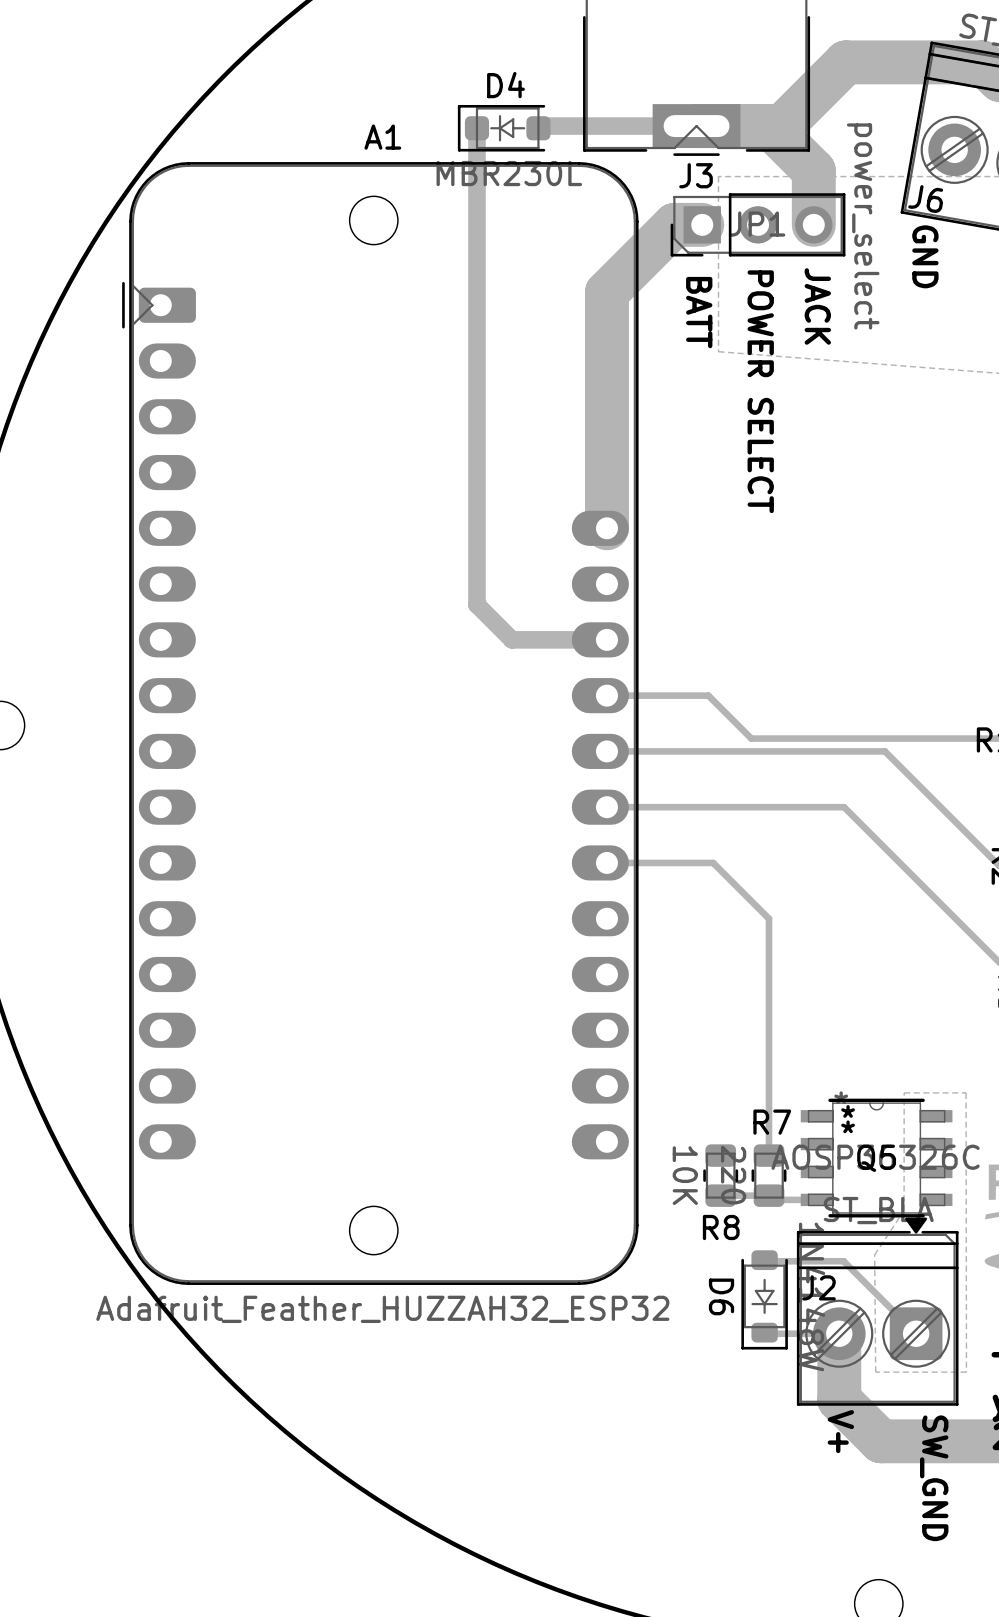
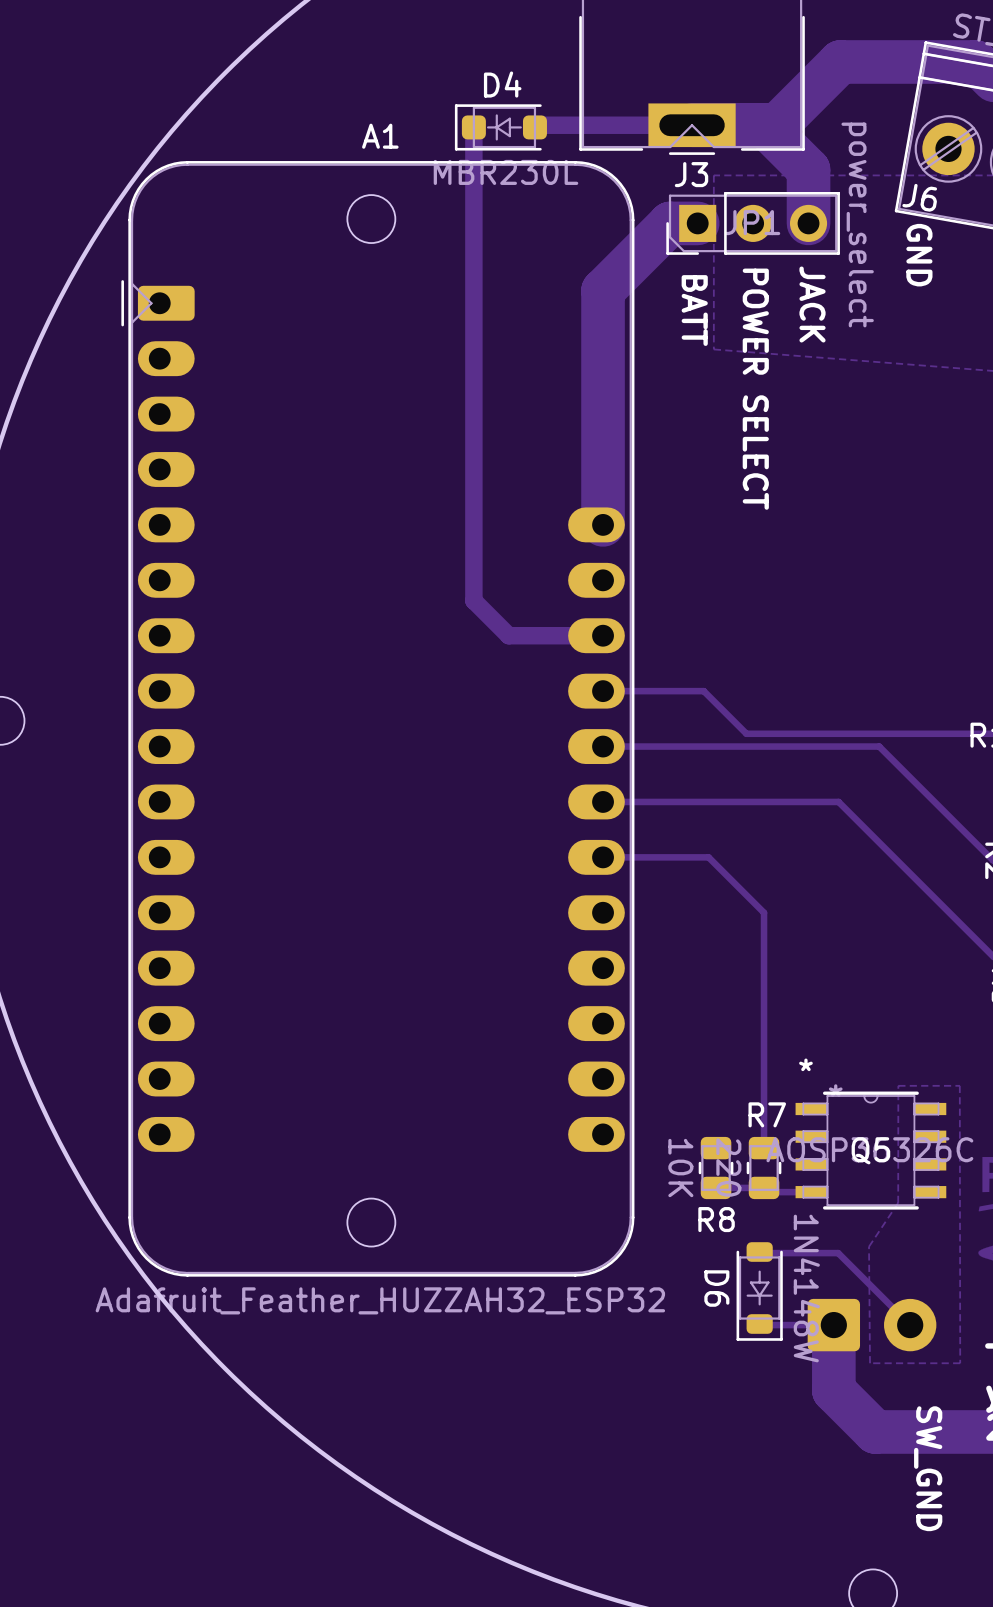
Q5 text position: * (848, 1111) -> * (805, 1064)
Q5 text: * (848, 1126) -> none
J2 side: bottom (877, 1311) -> top (872, 1325)
text: V+ (840, 1431) -> none

